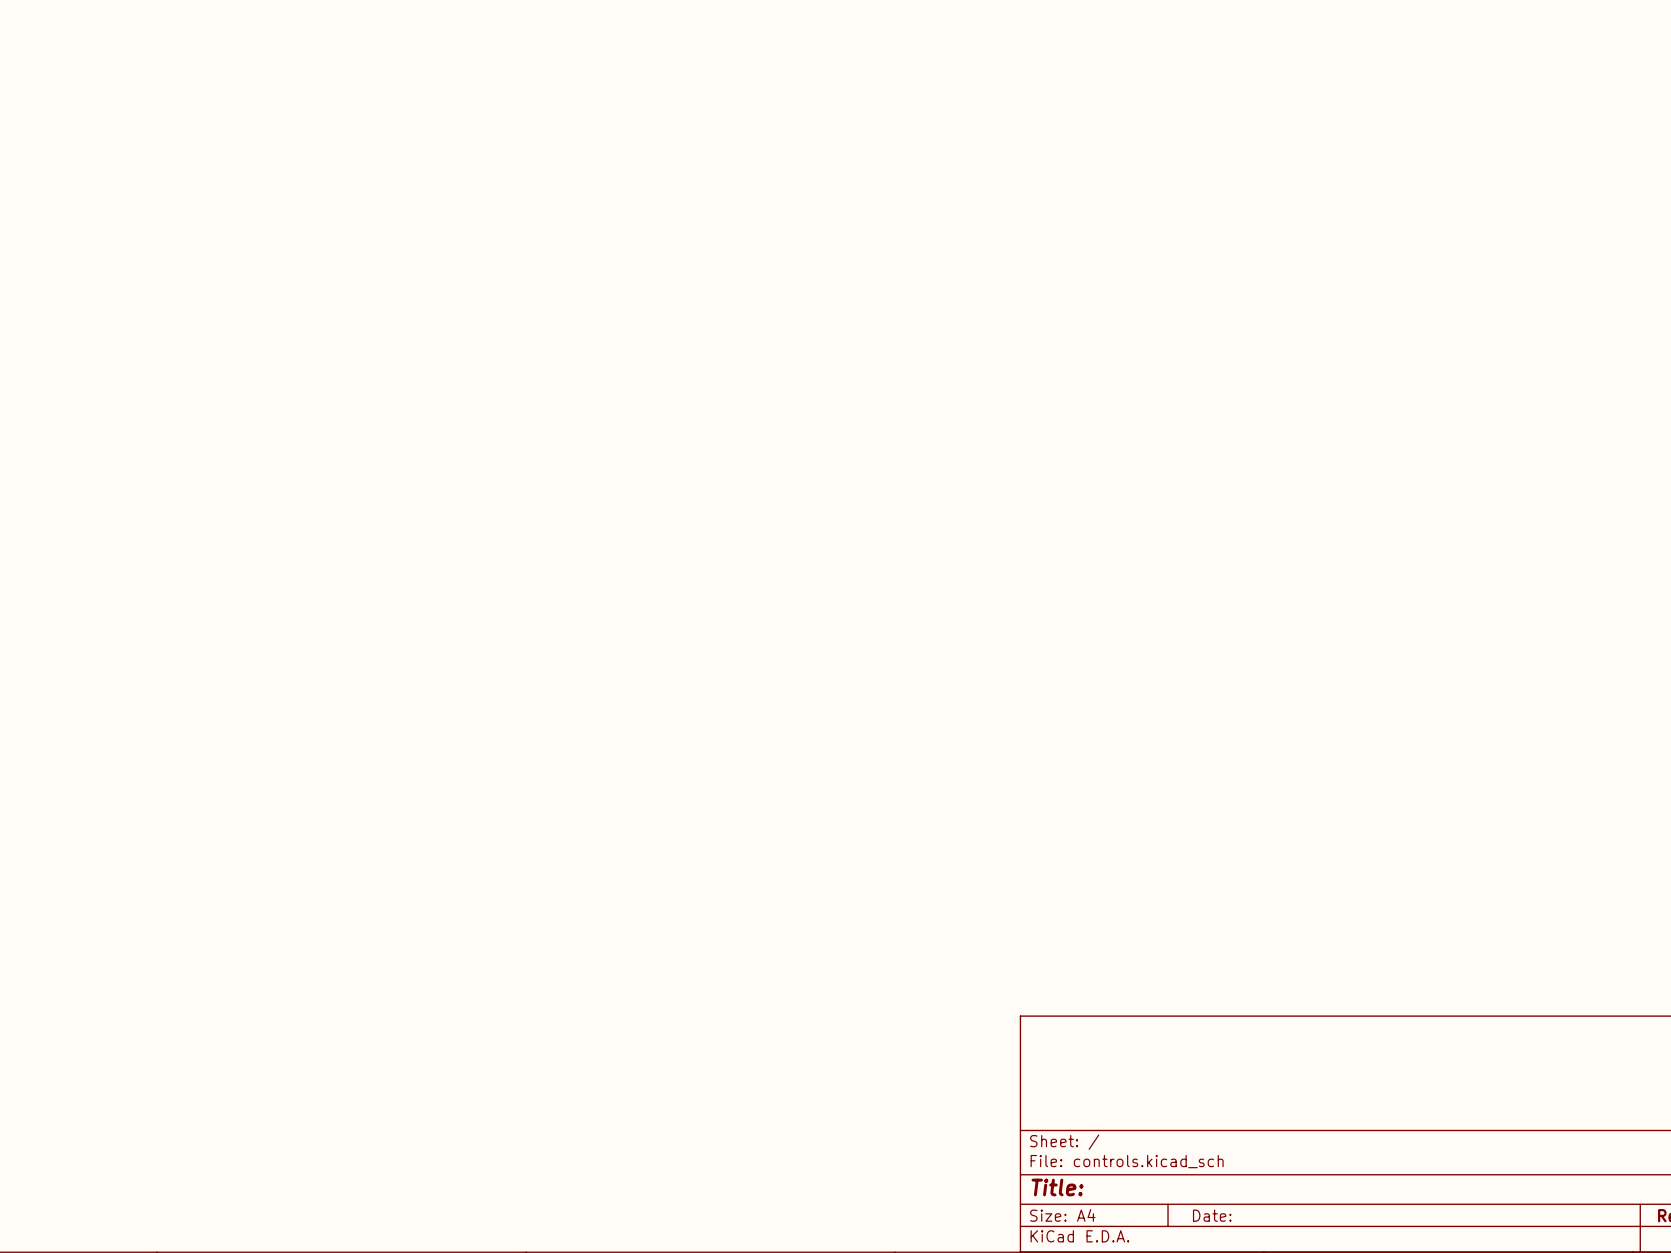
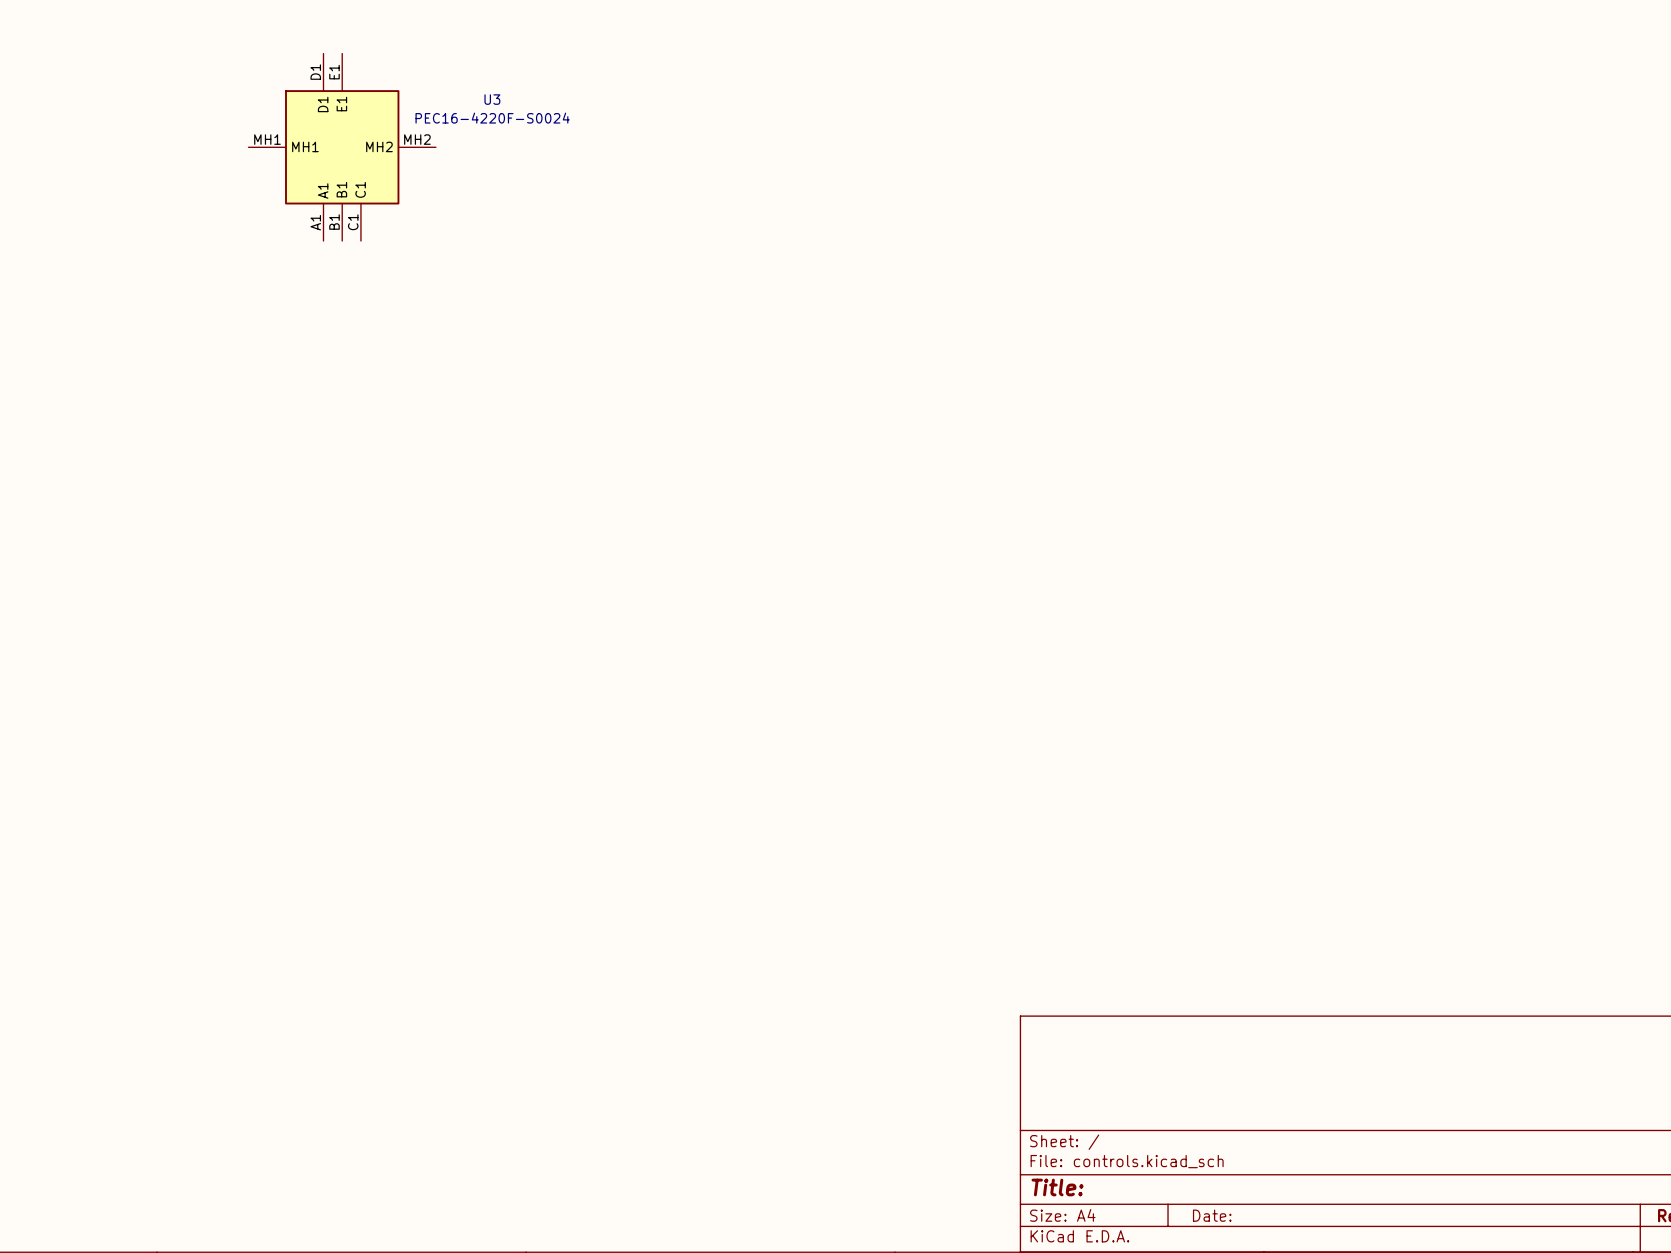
U3: none -> PEC16-4220F-S0024 (342, 147)

